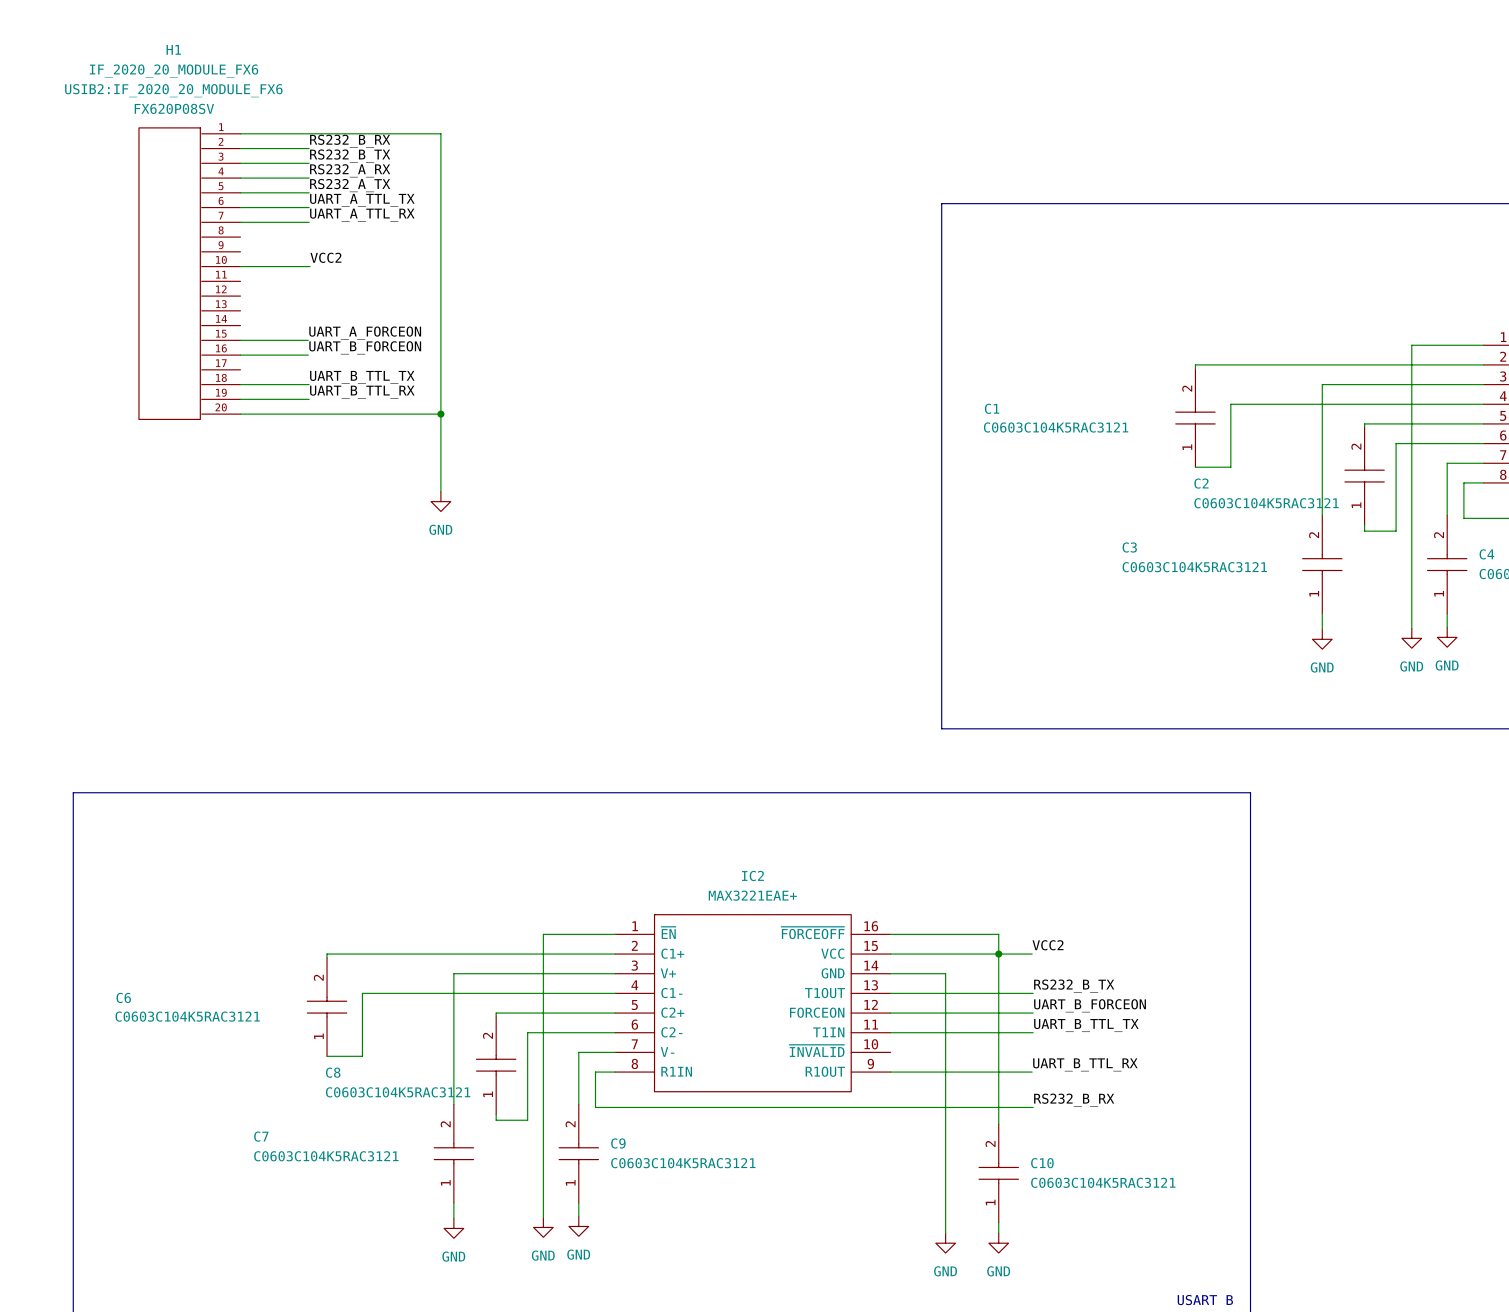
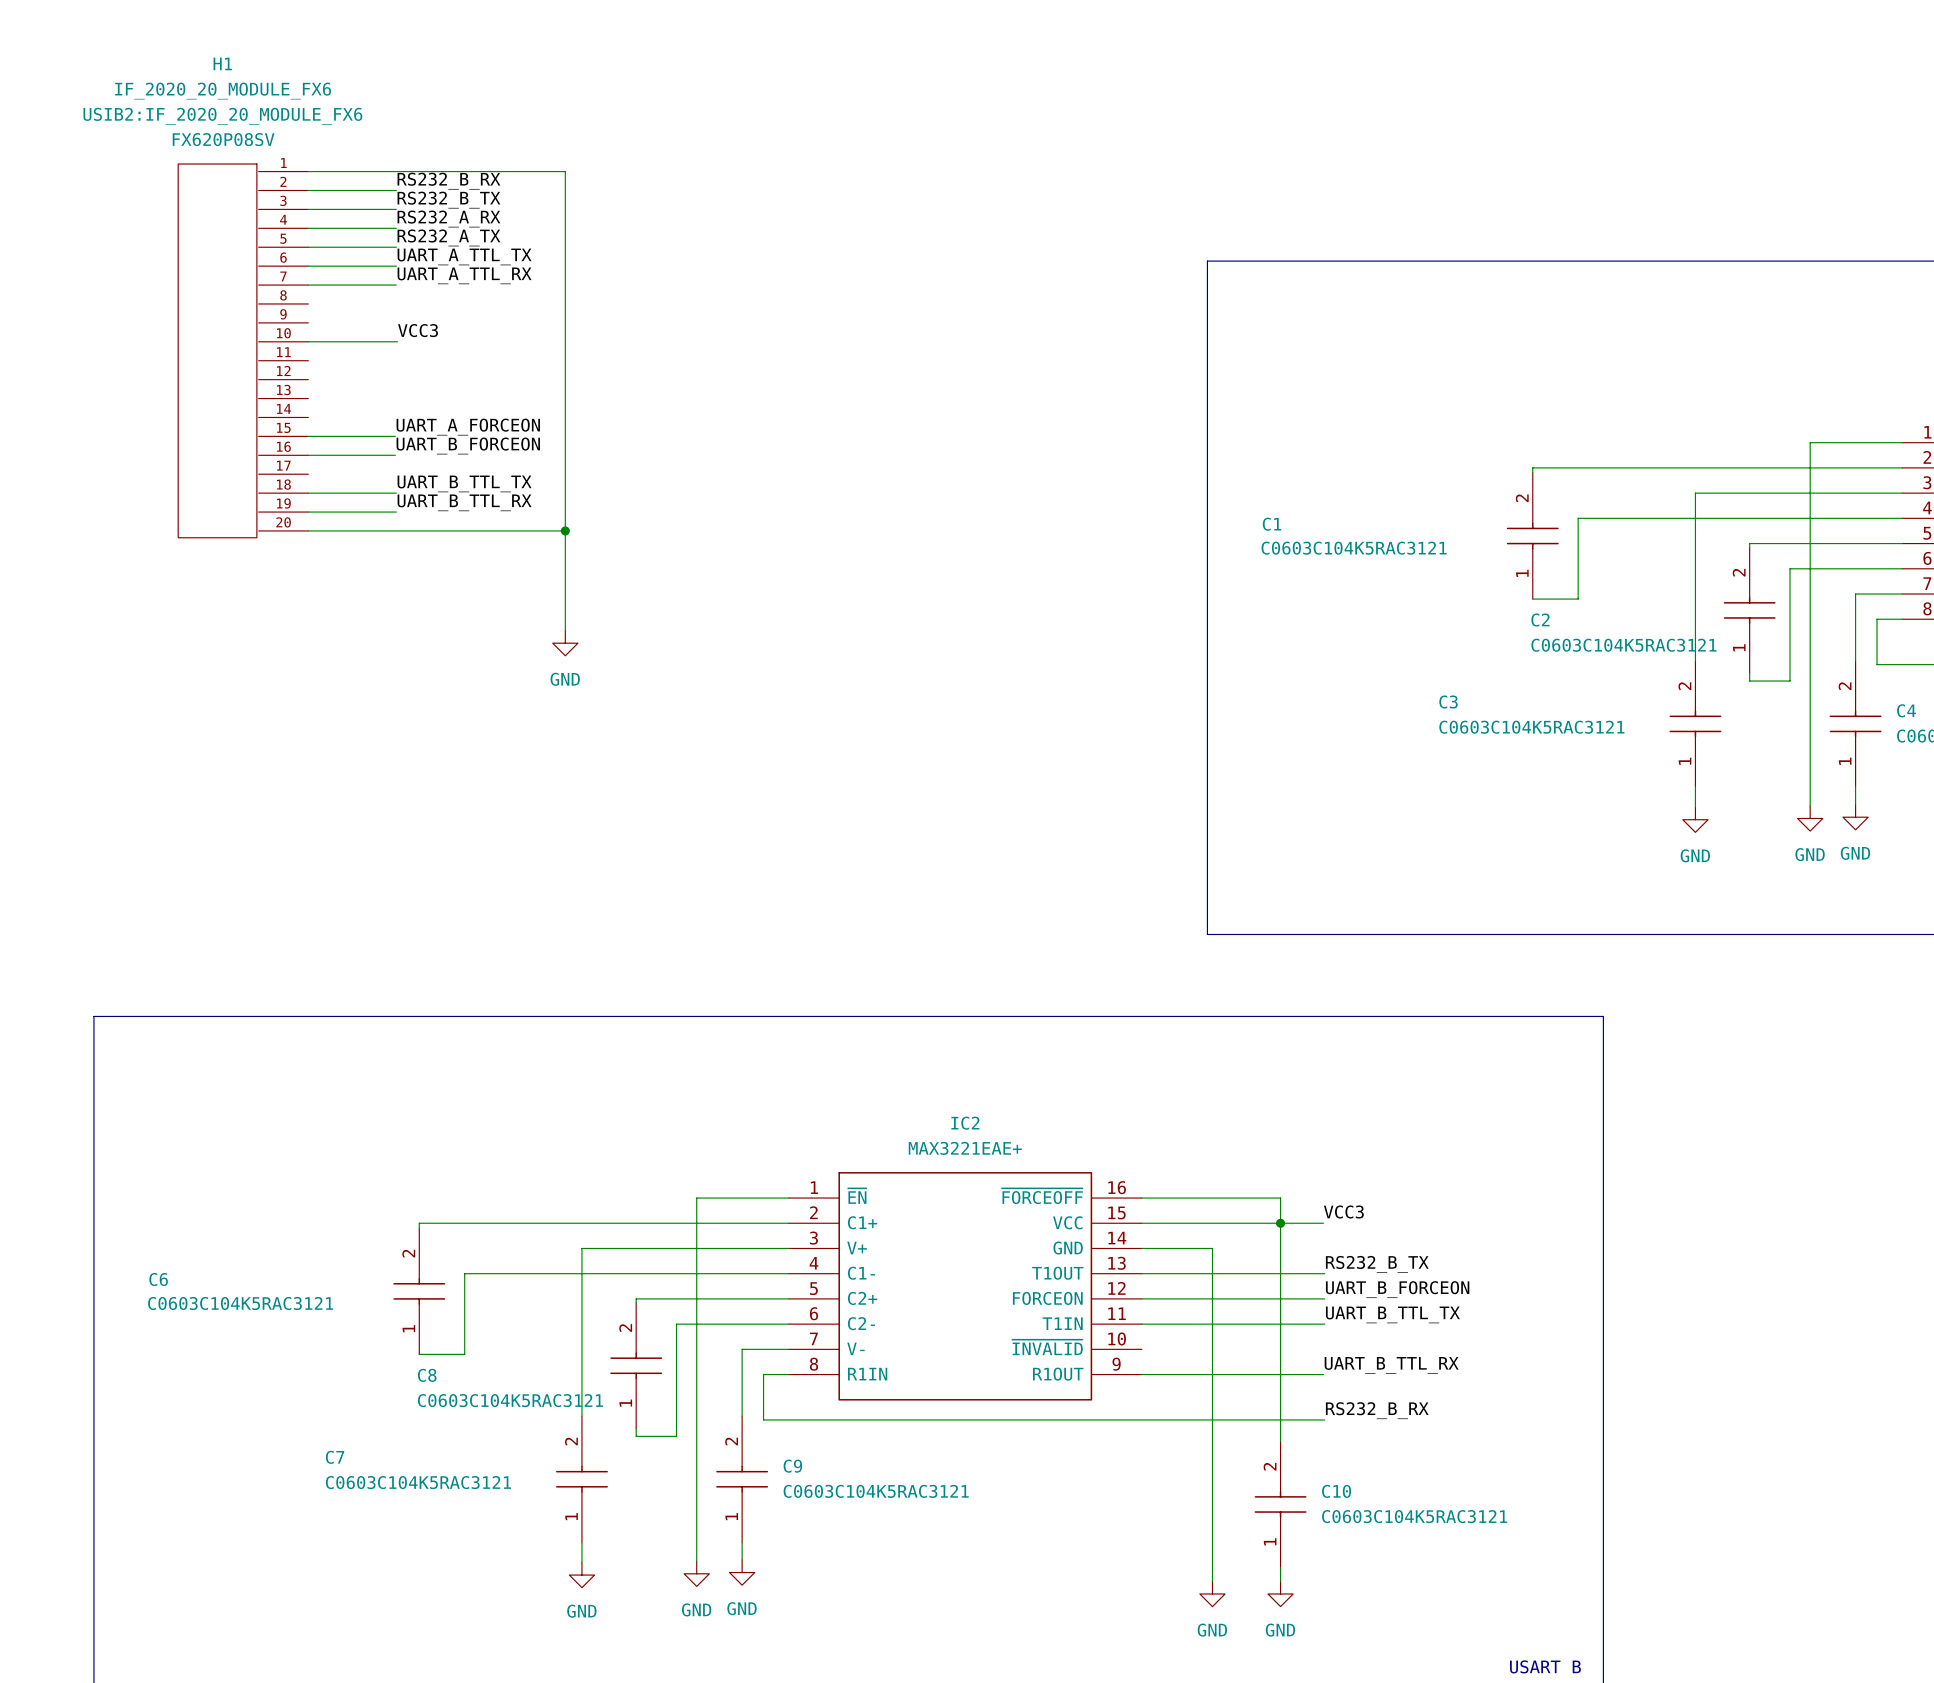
label: VCC2 (325, 257) -> VCC3 (418, 330)
label: VCC2 (1048, 945) -> VCC3 (1343, 1212)

